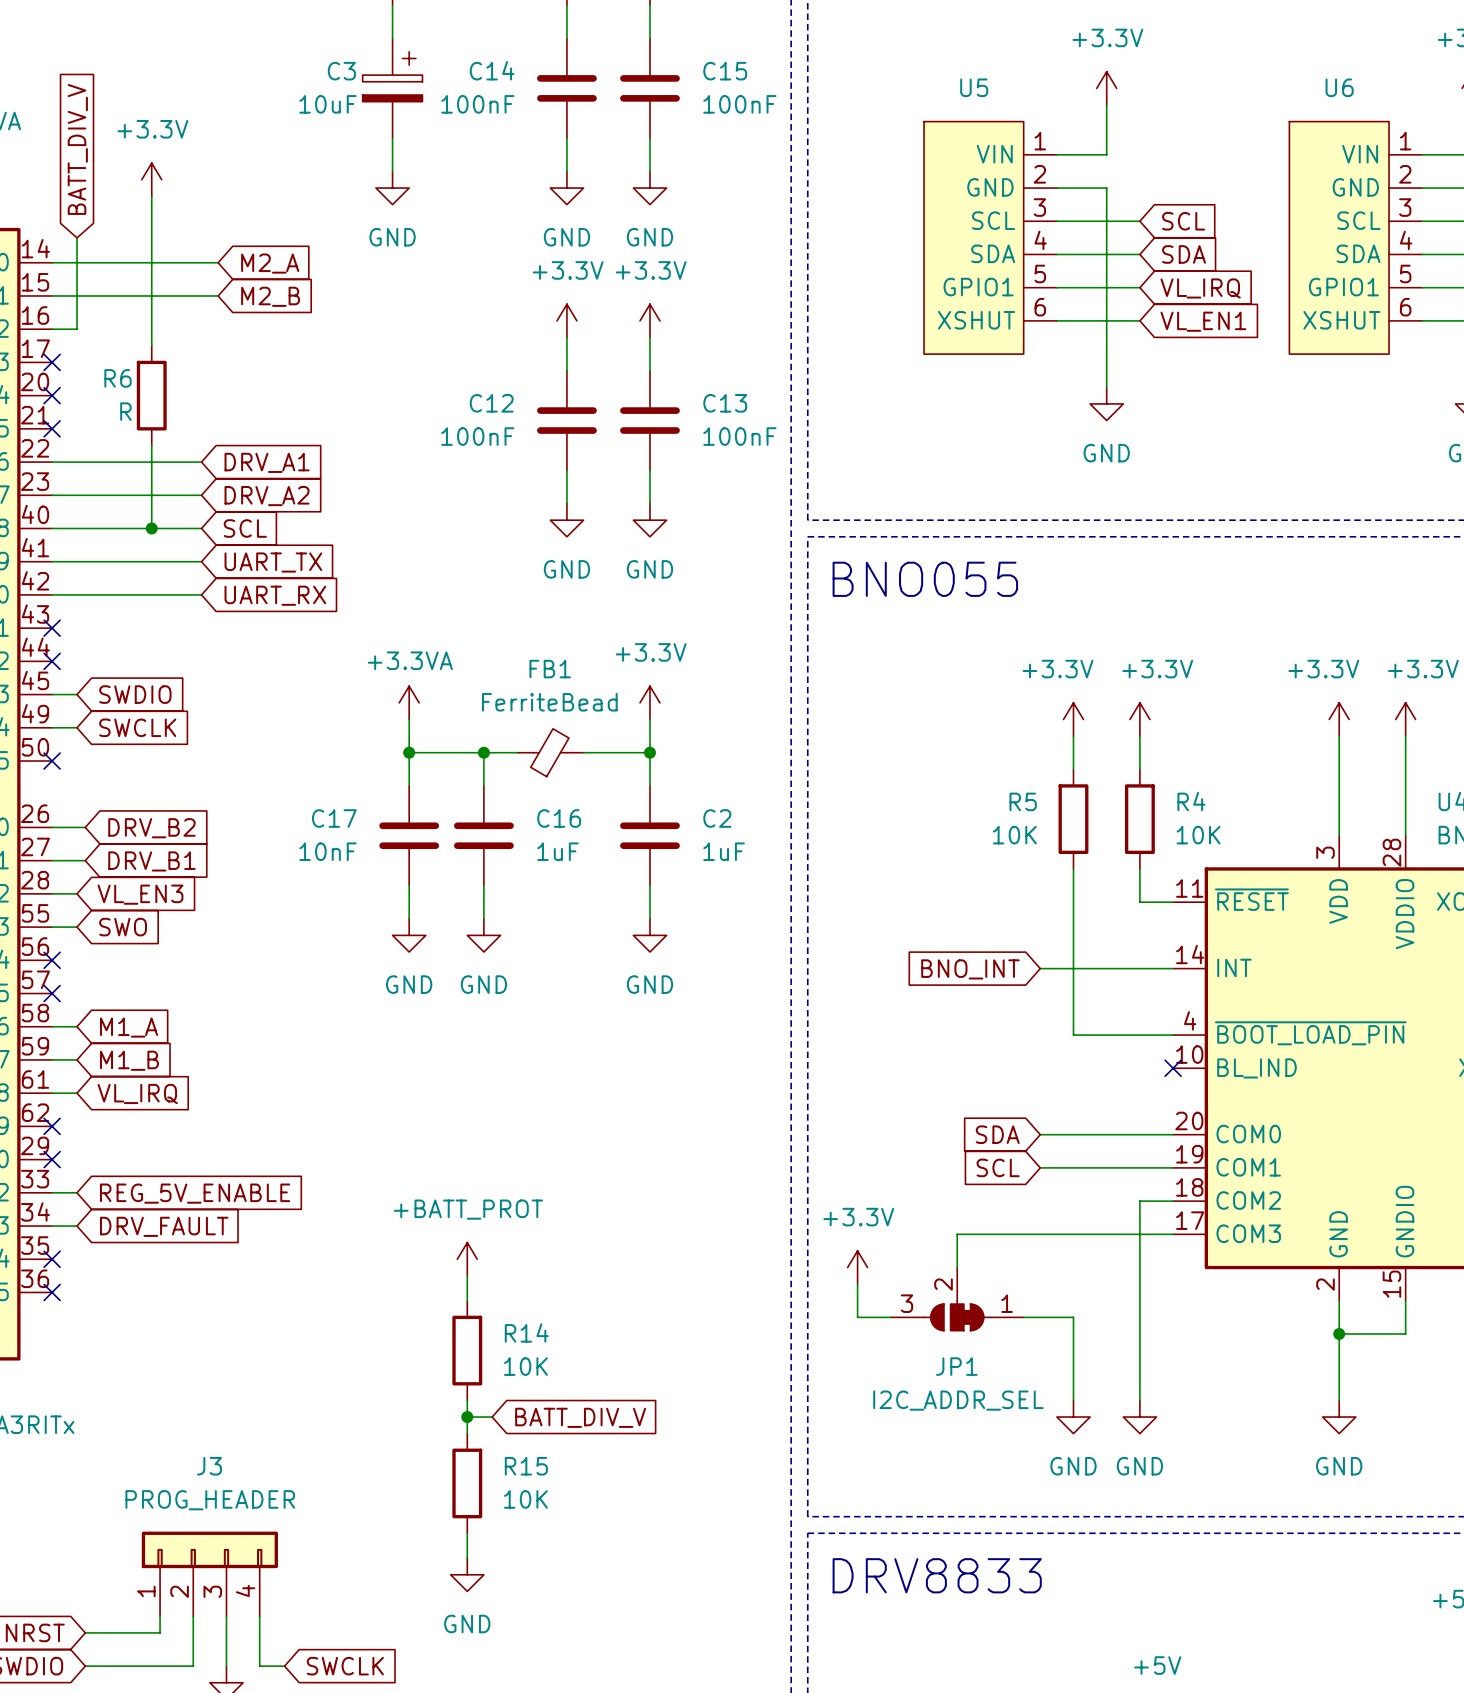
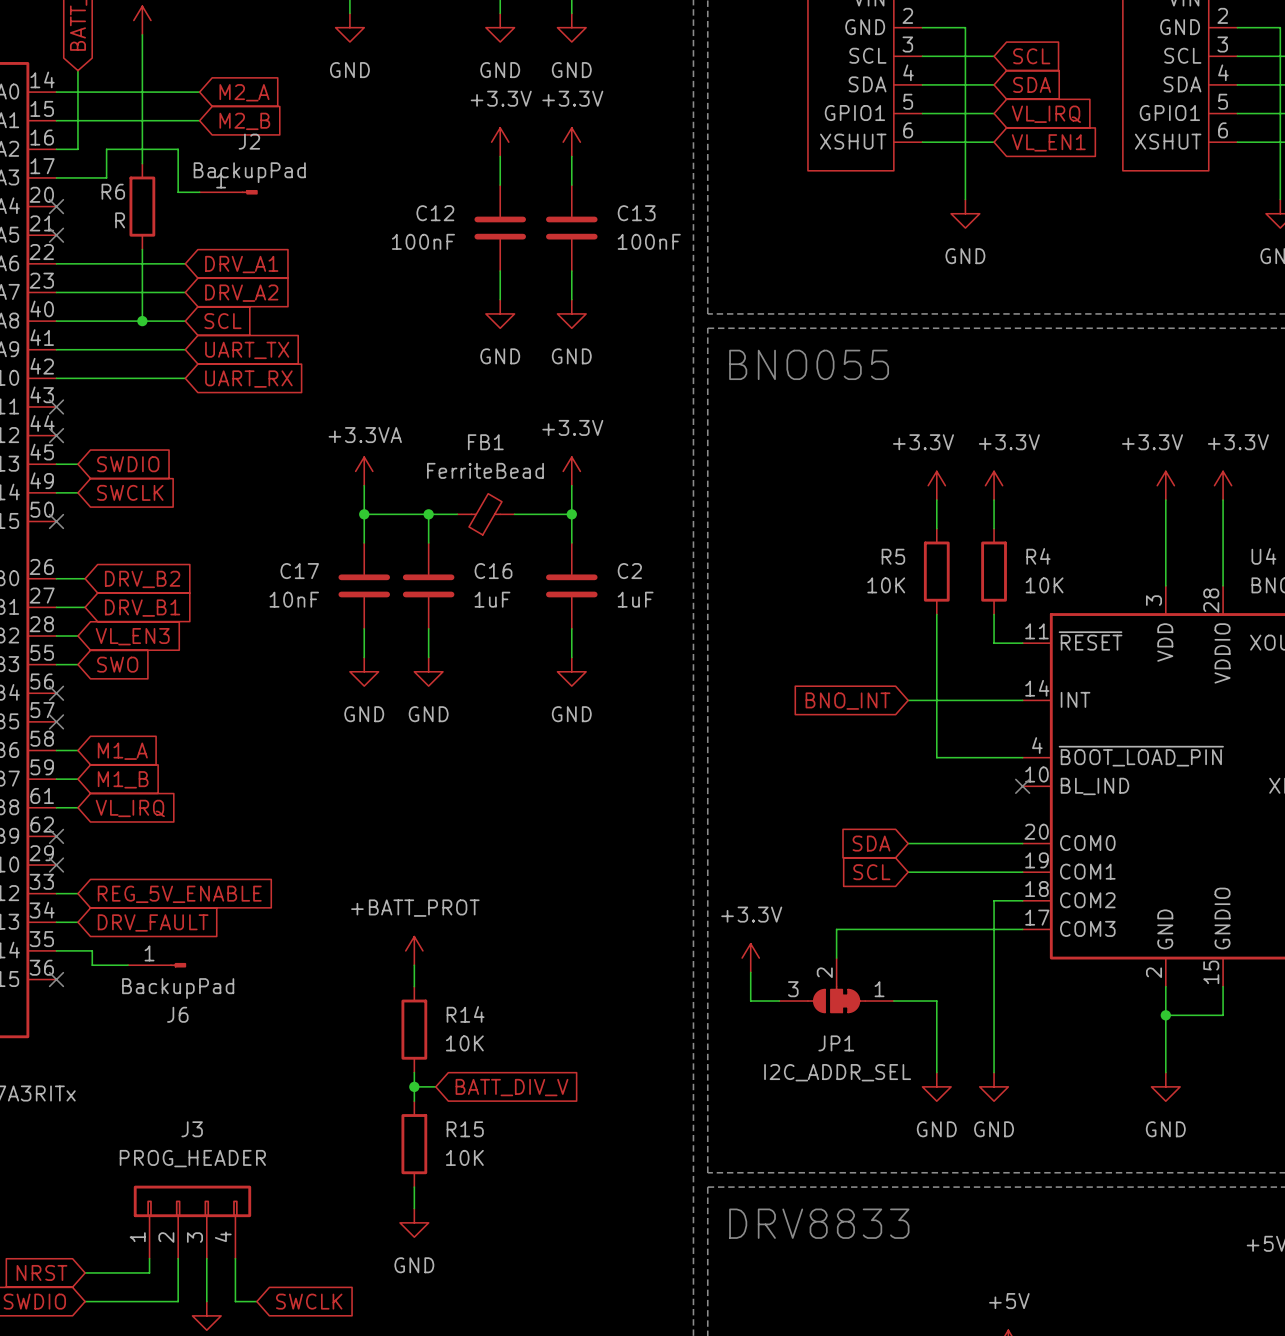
wire: none -> (56, 177) (106, 177) (106, 149) (178, 149) (178, 192) (199, 192)
no-connect mark: (52, 362) -> none
J2: none -> BackupPad (228, 192)
wire: none -> (56, 950) (92, 950) (92, 965) (128, 965)
no-connect mark: (52, 1259) -> none
J6: none -> BackupPad (157, 965)

